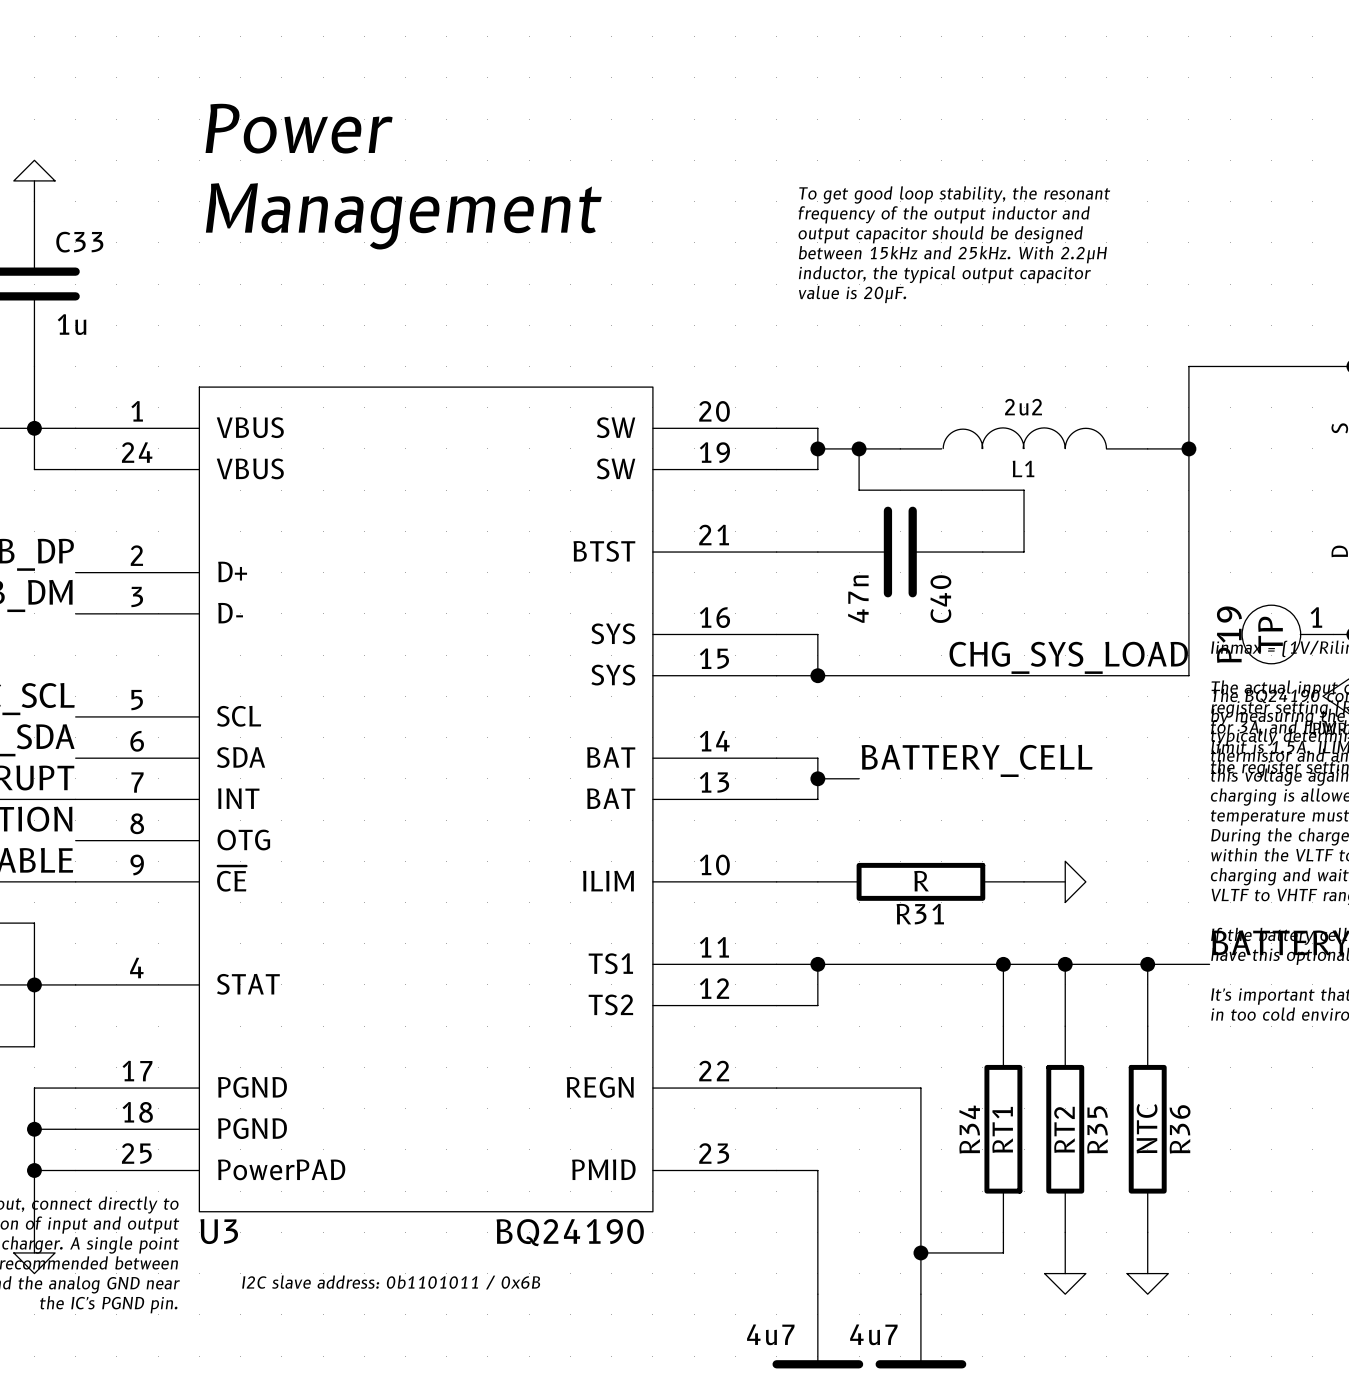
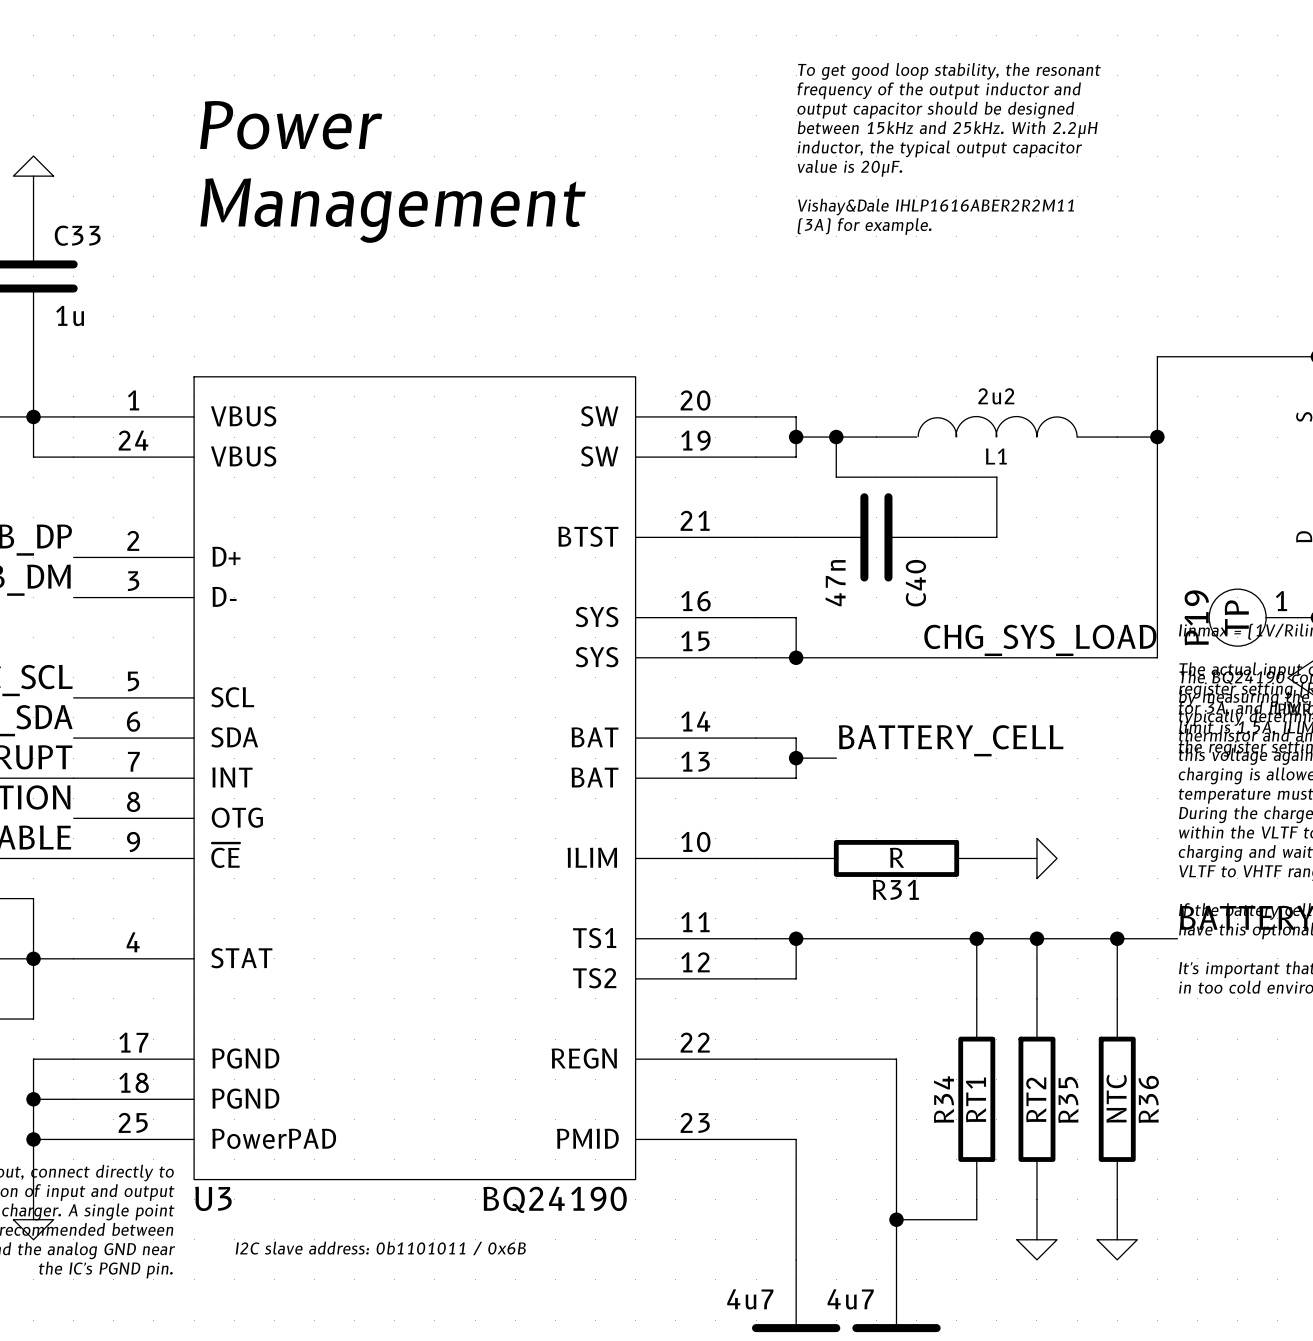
text position: To get good loop stability, the resonant (954, 194) -> To get good loop stability, the resonant (949, 71)
text: none -> Vishay&Dale IHLP1616ABER2R2M11 (936, 207)
text position: frequency of the output inductor and (944, 214) -> frequency of the output inductor and (939, 90)
text: none -> (3A) for example. (864, 226)
text position: output capacitor should be designed (940, 234) -> output capacitor should be designed (935, 110)
text position: between 15kHz and 25kHz. With 2.2μH (952, 254) -> between 15kHz and 25kHz. With 2.2μH (947, 129)
text position: inductor, the typical output capacitor (944, 274) -> inductor, the typical output capacitor (939, 148)
text position: value is 20μF. (852, 294) -> value is 20μF. (850, 168)

